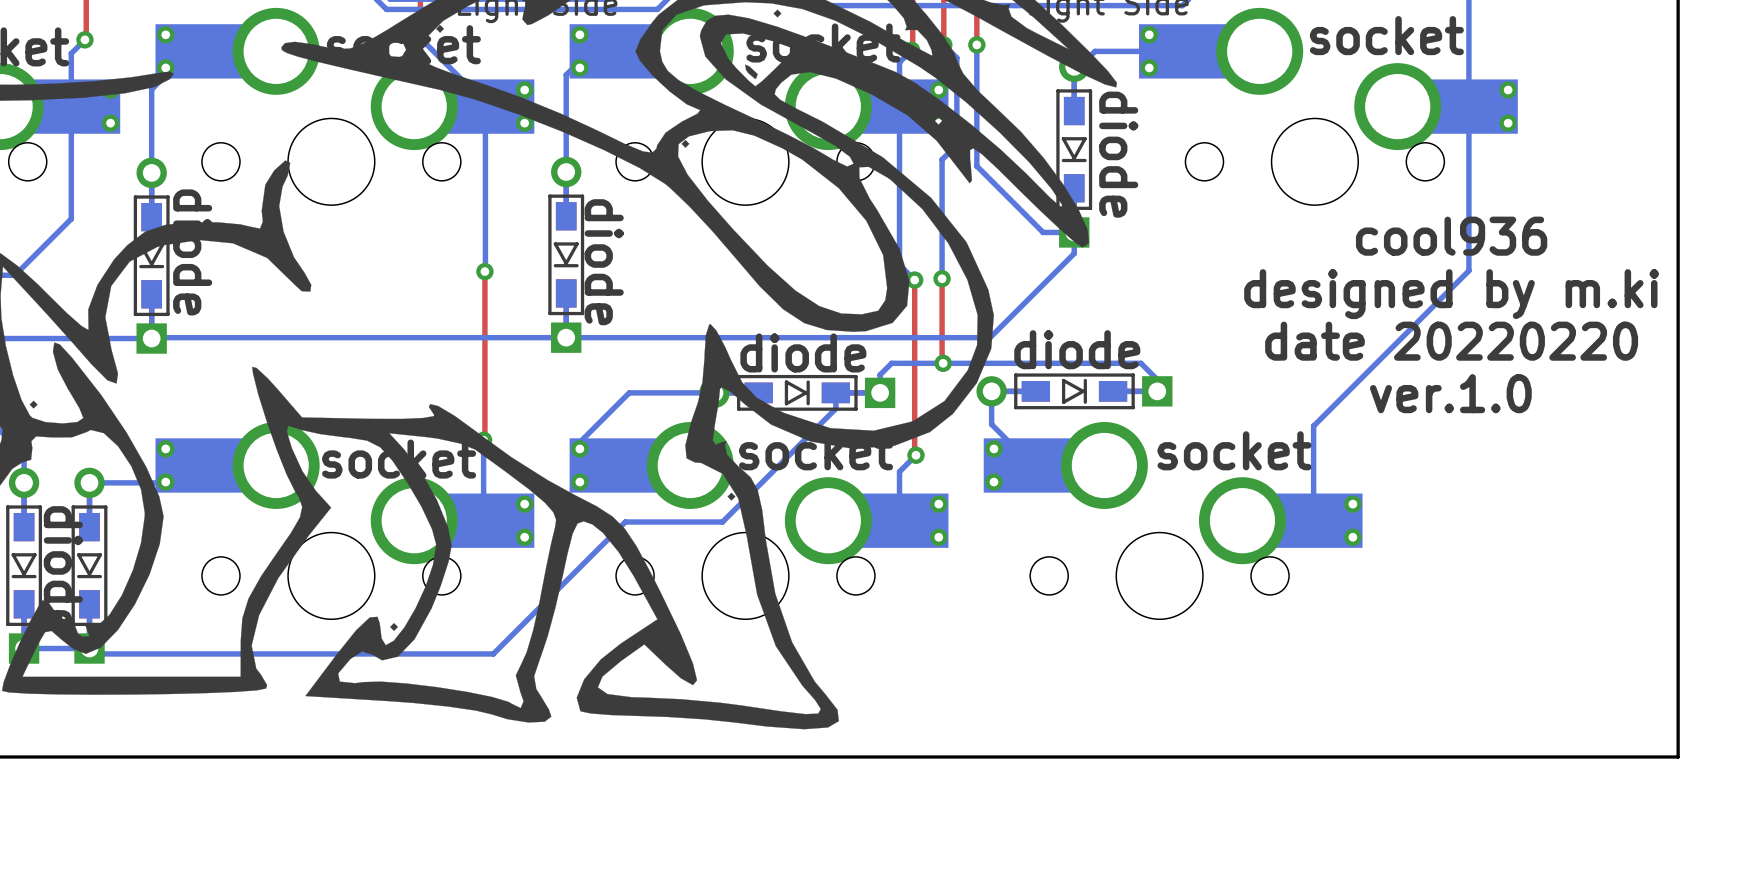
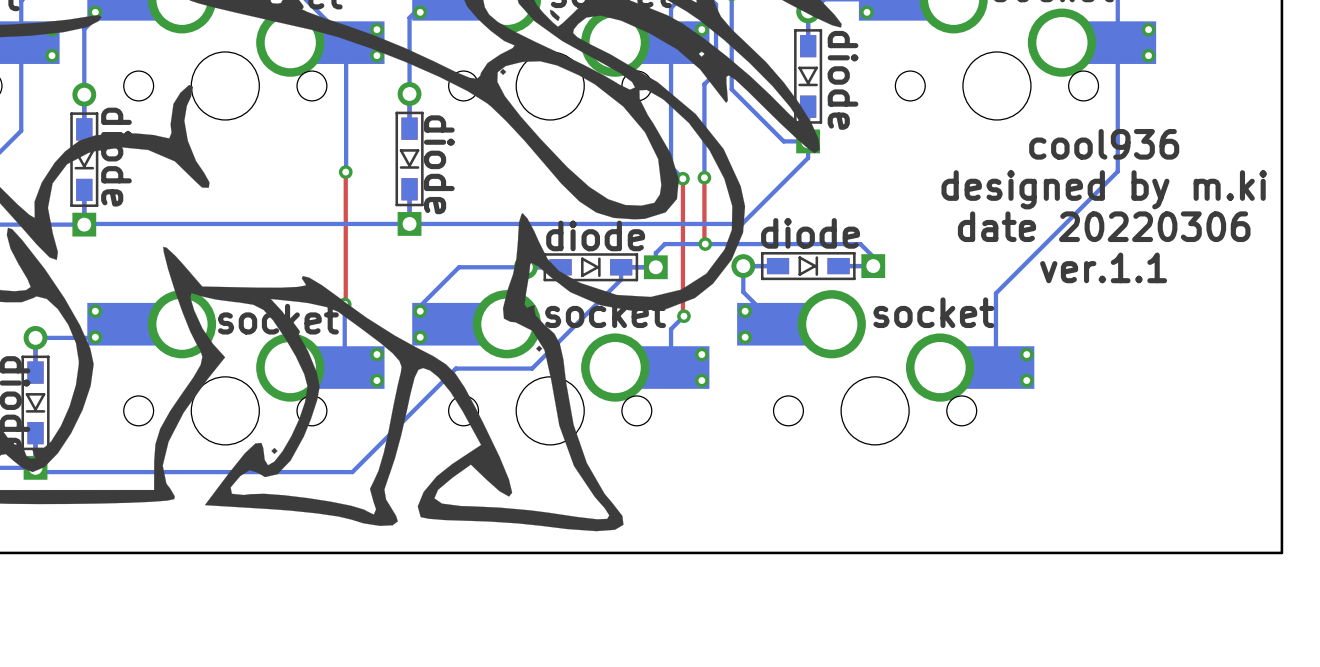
text: date 20220220 (1451, 341) -> date 20220306 (1104, 226)
text: ver.1.0 (1450, 393) -> ver.1.1 (1103, 267)

